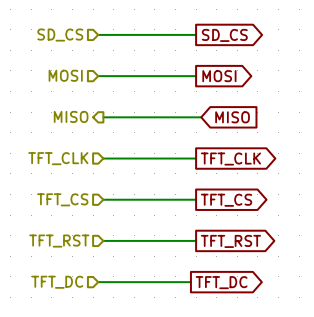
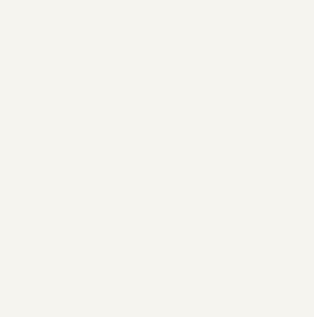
wire: (98, 34) (196, 34) -> none
hierarchical label: SD_CS (60, 35) -> none
global label: SD_CS (224, 35) -> none
hierarchical label: MOSI (65, 75) -> none
wire: (98, 76) (196, 76) -> none
global label: MOSI (219, 76) -> none
hierarchical label: MISO (71, 116) -> none
wire: (103, 117) (201, 117) -> none
global label: MISO (232, 117) -> none
hierarchical label: TFT_CLK (58, 158) -> none
wire: (103, 158) (196, 158) -> none
global label: TFT_CLK (230, 159) -> none
hierarchical label: TFT_CS (62, 199) -> none
wire: (103, 199) (196, 199) -> none
global label: TFT_CS (226, 200) -> none
wire: (103, 240) (196, 240) -> none
hierarchical label: TFT_RST (59, 241) -> none
global label: TFT_RST (230, 241) -> none
hierarchical label: TFT_DC (57, 282) -> none
wire: (98, 282) (190, 282) -> none
global label: TFT_DC (221, 282) -> none

